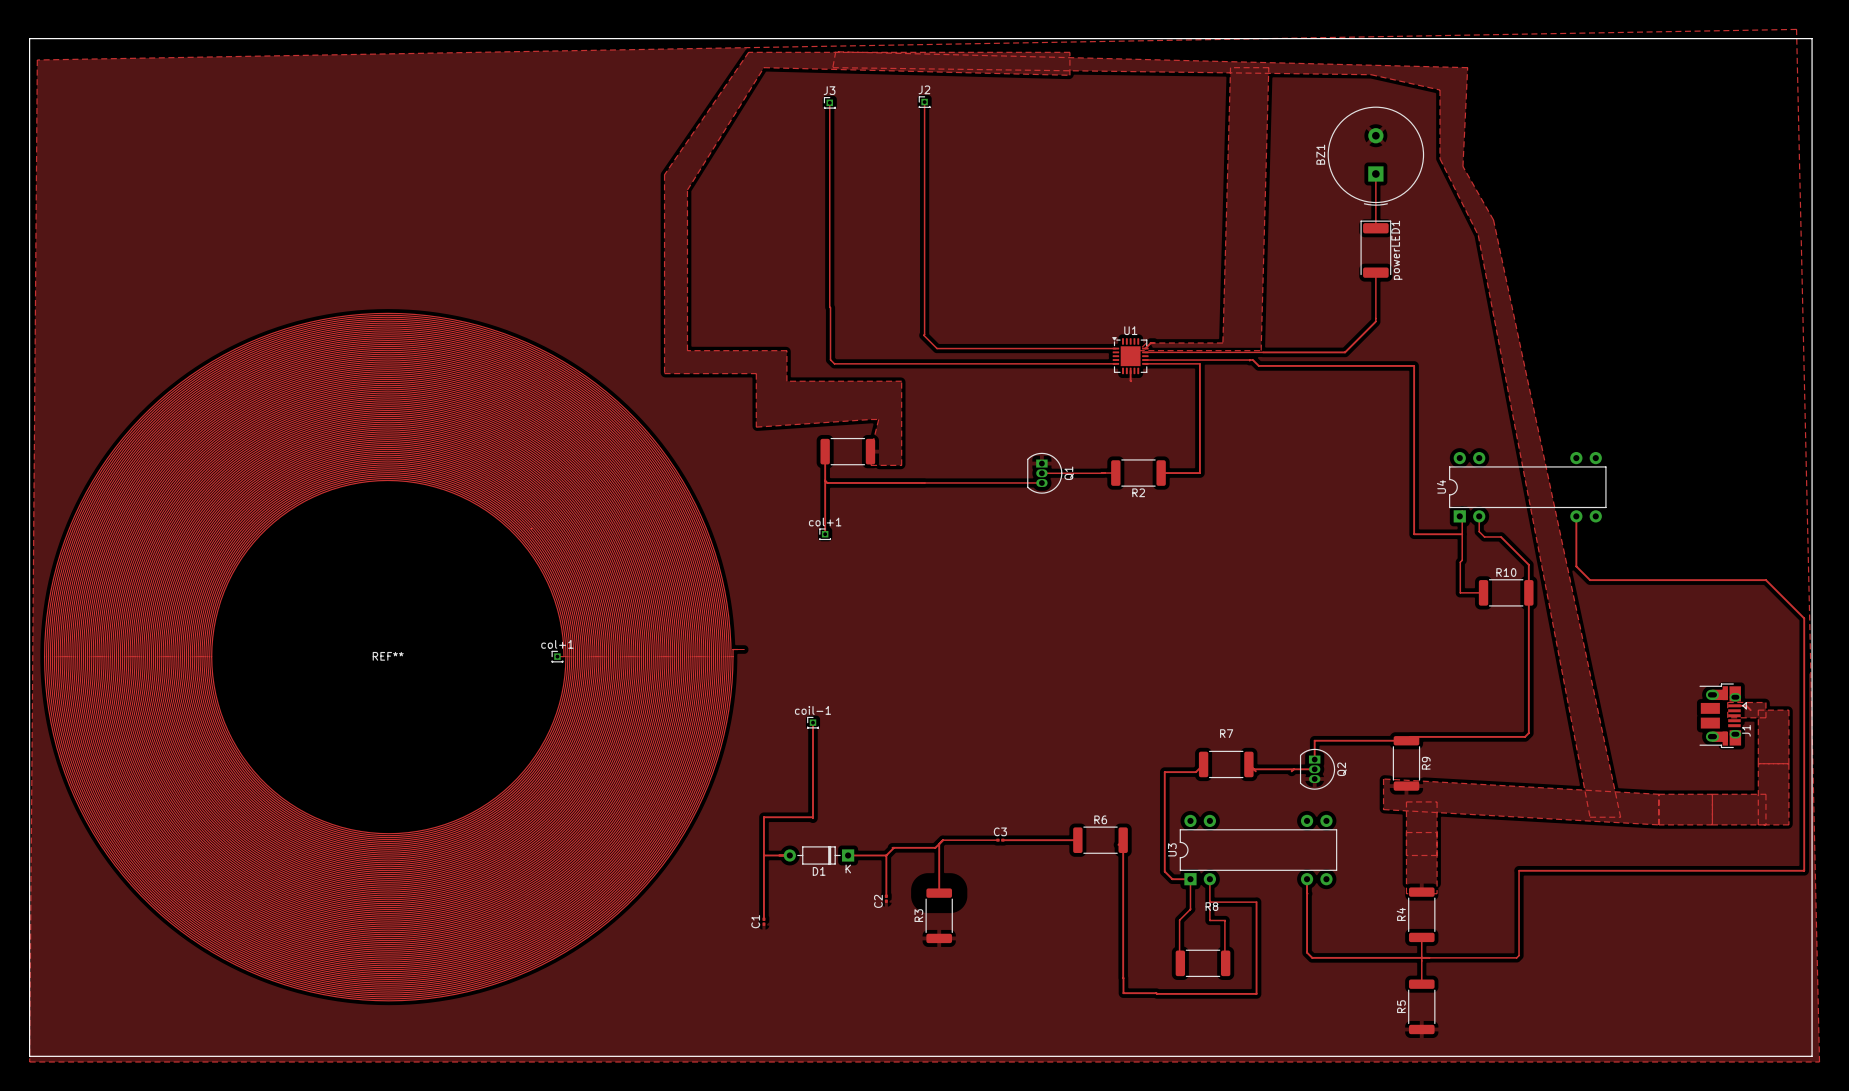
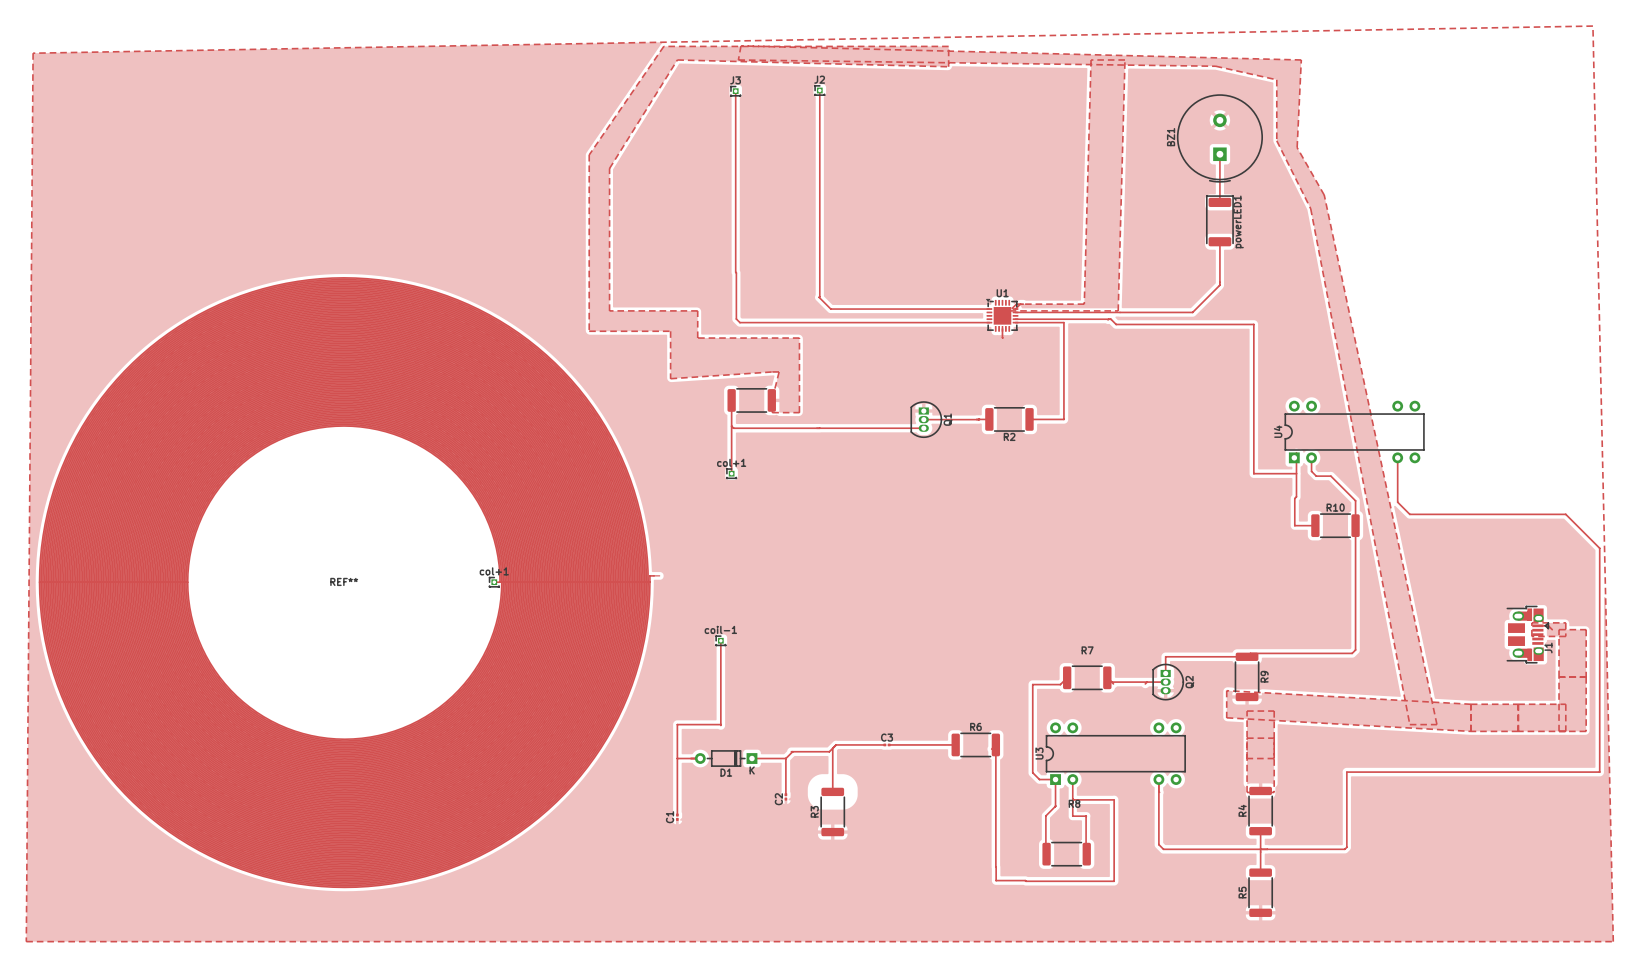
board edge: (29, 38) (1812, 38) (1812, 1056) (29, 1056) (29, 38) -> none

